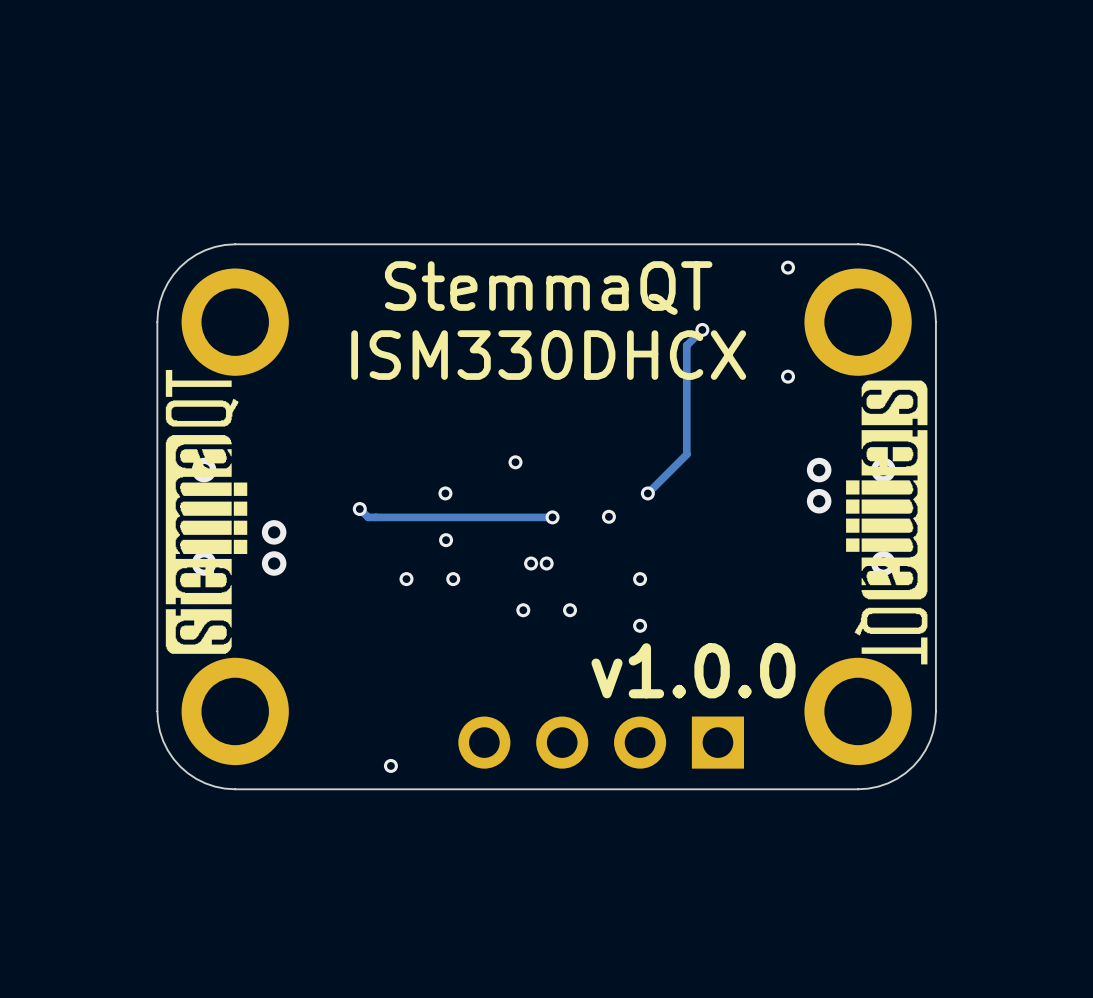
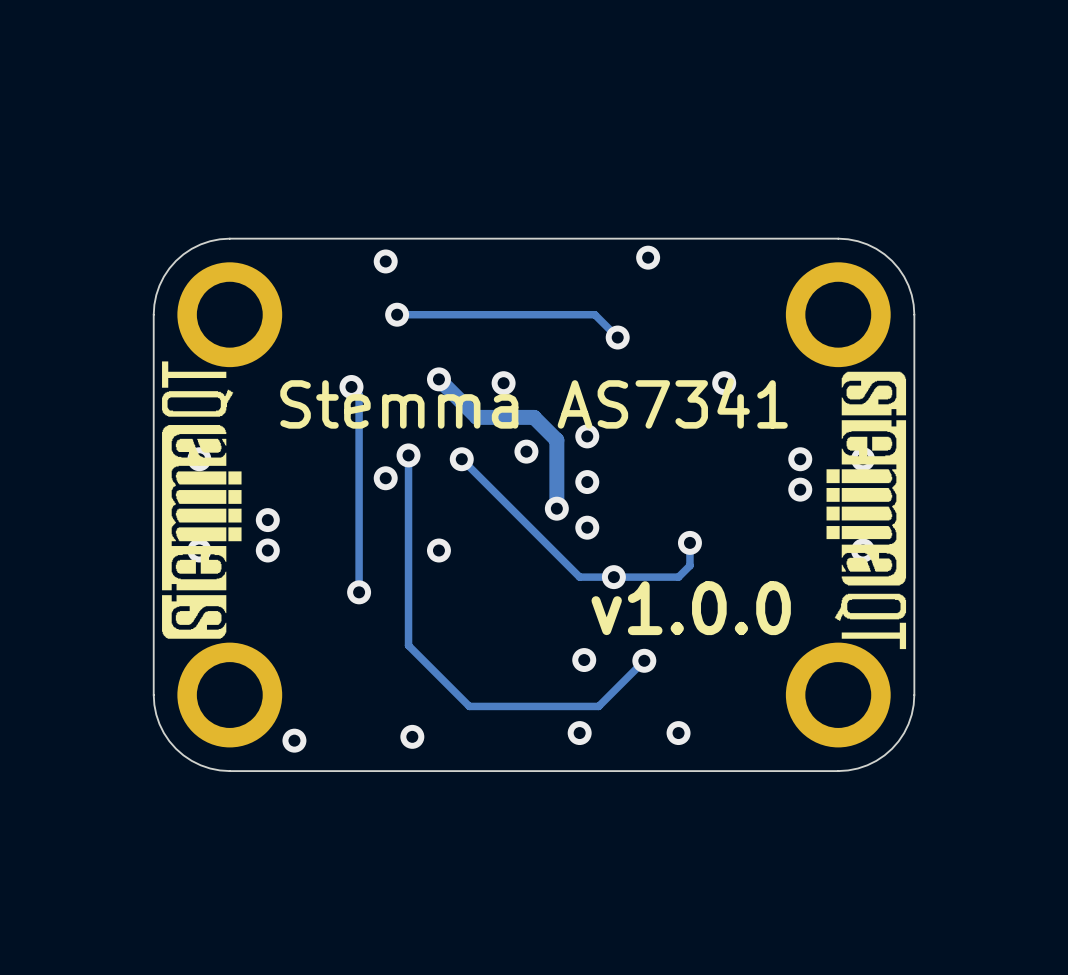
via: none -> (648, 257)
via: none -> (385, 261)
via: (788, 267) -> none
text: StemmaQT (548, 288) -> none
track: none -> (397, 314) (594, 314) (617, 337)
via: none -> (397, 314)
track: (702, 329) (686, 345) (686, 454) (647, 493) -> none
via: (702, 329) -> none
via: none -> (617, 337)
text: ISM330DHCX (548, 355) -> none
via: (788, 376) -> none
track: none -> (438, 379) (476, 417) (534, 417) (556, 440) (556, 508)
via: none -> (438, 379)
via: none -> (503, 383)
via: none -> (724, 383)
track: none -> (351, 386) (359, 394) (359, 592)
via: none -> (351, 386)
text: none -> Stemma AS7341 (534, 403)
via: none -> (587, 436)
via: (515, 462) -> none
via: none -> (526, 451)
track: none -> (408, 455) (408, 645) (469, 706) (598, 706) (644, 660)
via: none -> (408, 455)
track: none -> (461, 459) (579, 577) (678, 577) (689, 565) (689, 542)
via: none -> (461, 459)
via: none -> (385, 478)
via: (445, 493) -> none
via: none -> (587, 482)
via: (647, 493) -> none
track: (359, 509) (368, 517) (552, 517) -> none
via: (359, 509) -> none
via size: [545, 510, 560, 525] -> [544, 496, 569, 521]
via: (608, 516) -> none
via: (446, 540) -> none
via: none -> (587, 527)
via: none -> (689, 542)
via: (531, 563) -> none
via: (546, 563) -> none
via size: [446, 572, 461, 587] -> [426, 538, 451, 563]
via size: [633, 572, 648, 587] -> [601, 565, 626, 590]
via: (406, 579) -> none
via: none -> (359, 592)
via: (523, 610) -> none
via: (570, 610) -> none
via: (640, 625) -> none
text position: v1.0.0 (693, 670) -> v1.0.0 (691, 608)
via: none -> (584, 660)
via: none -> (644, 660)
part: (601, 742) -> none
via: none -> (579, 733)
via: none -> (678, 733)
via: none -> (412, 736)
via: none -> (294, 740)
via: (390, 765) -> none

